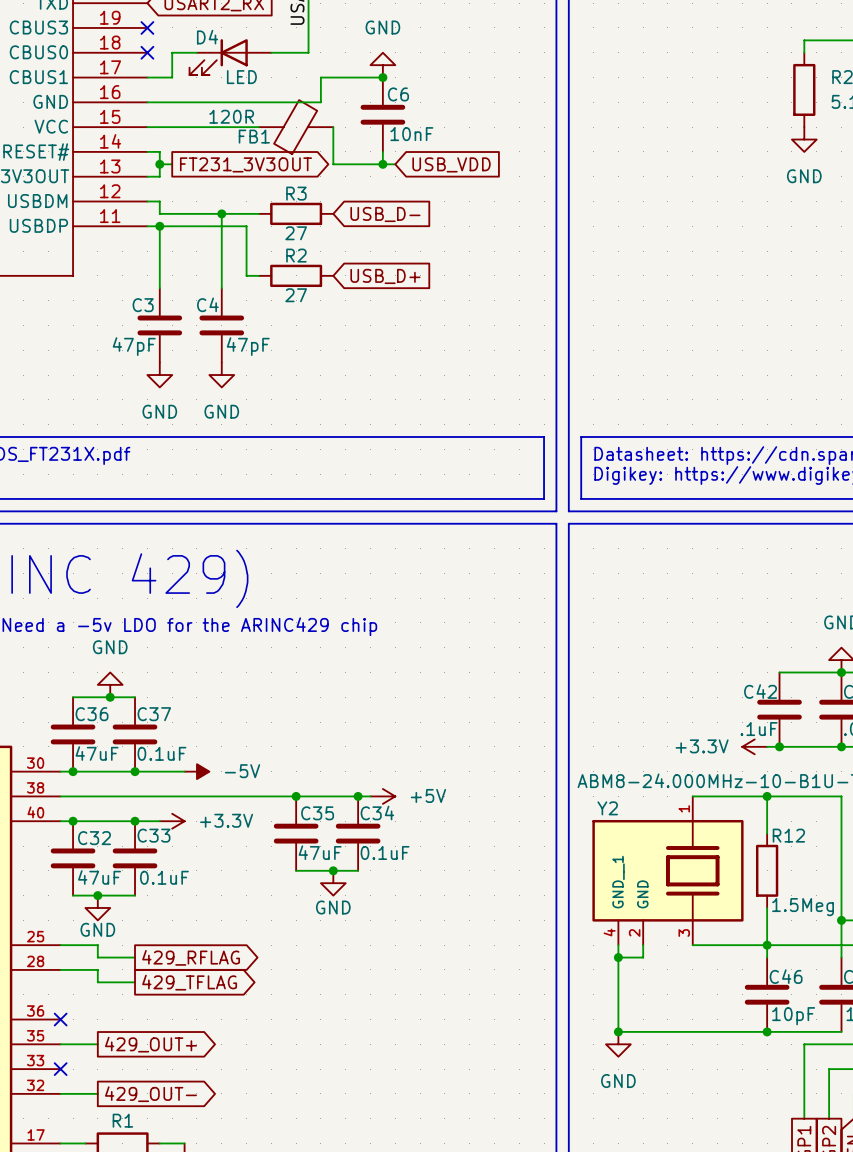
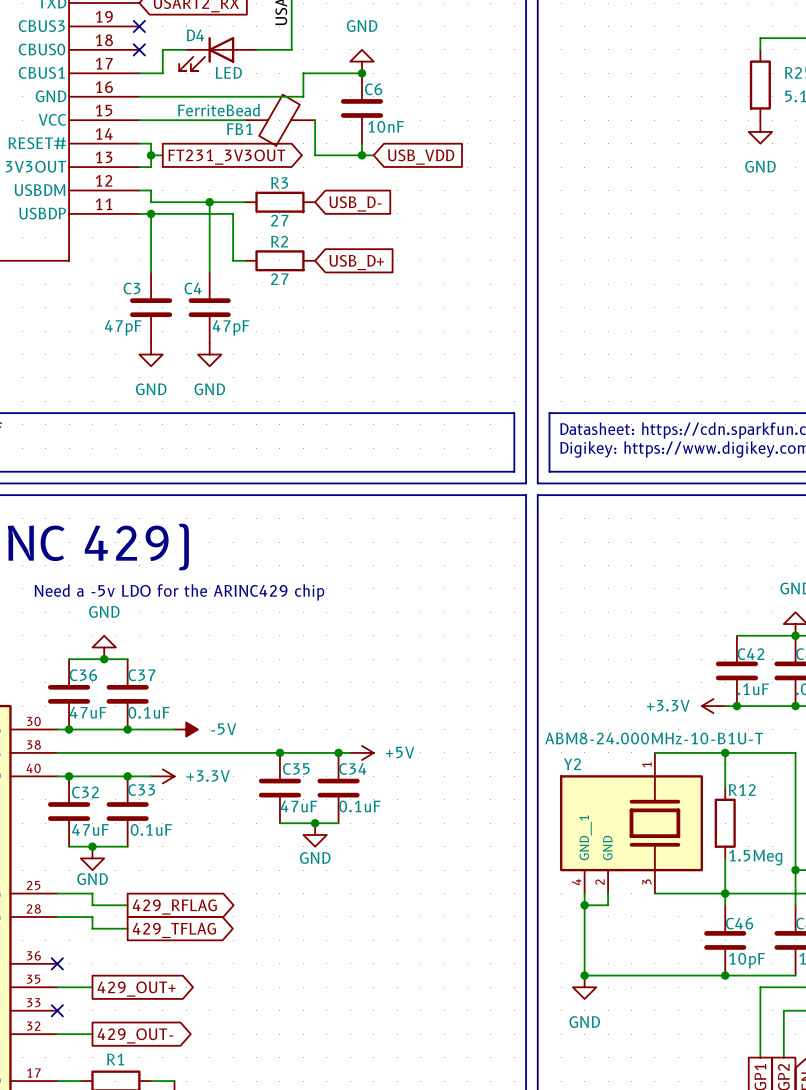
FB1 value: 120R (231, 116) -> FerriteBead (218, 110)
C42 name position: C42 (760, 691) -> C42 (751, 654)
C42 value position: .1uF (759, 729) -> .1uF (753, 689)

